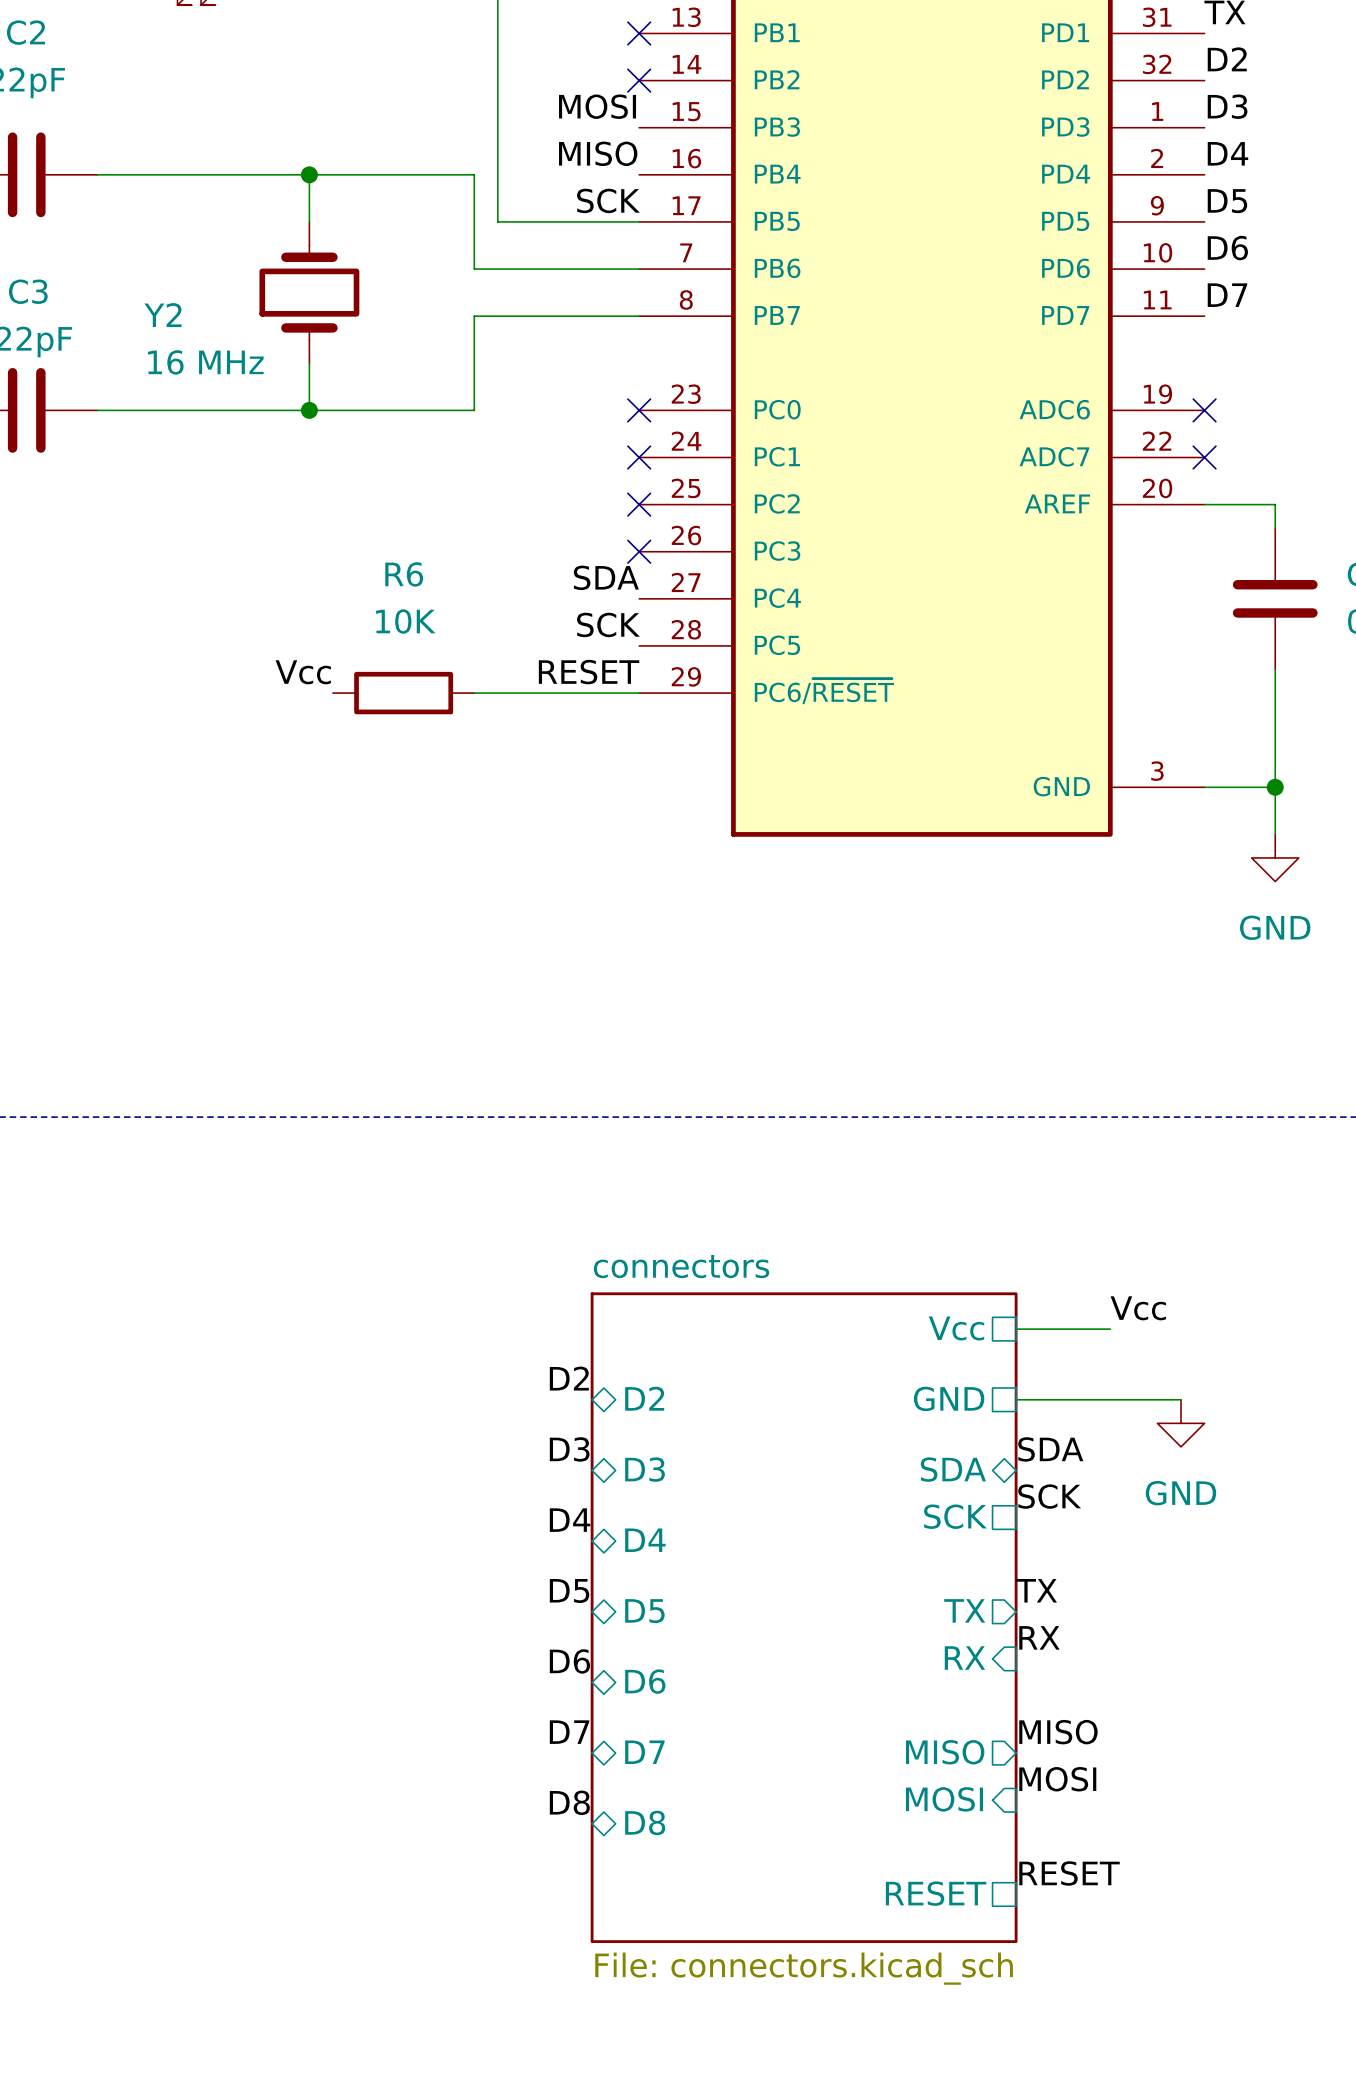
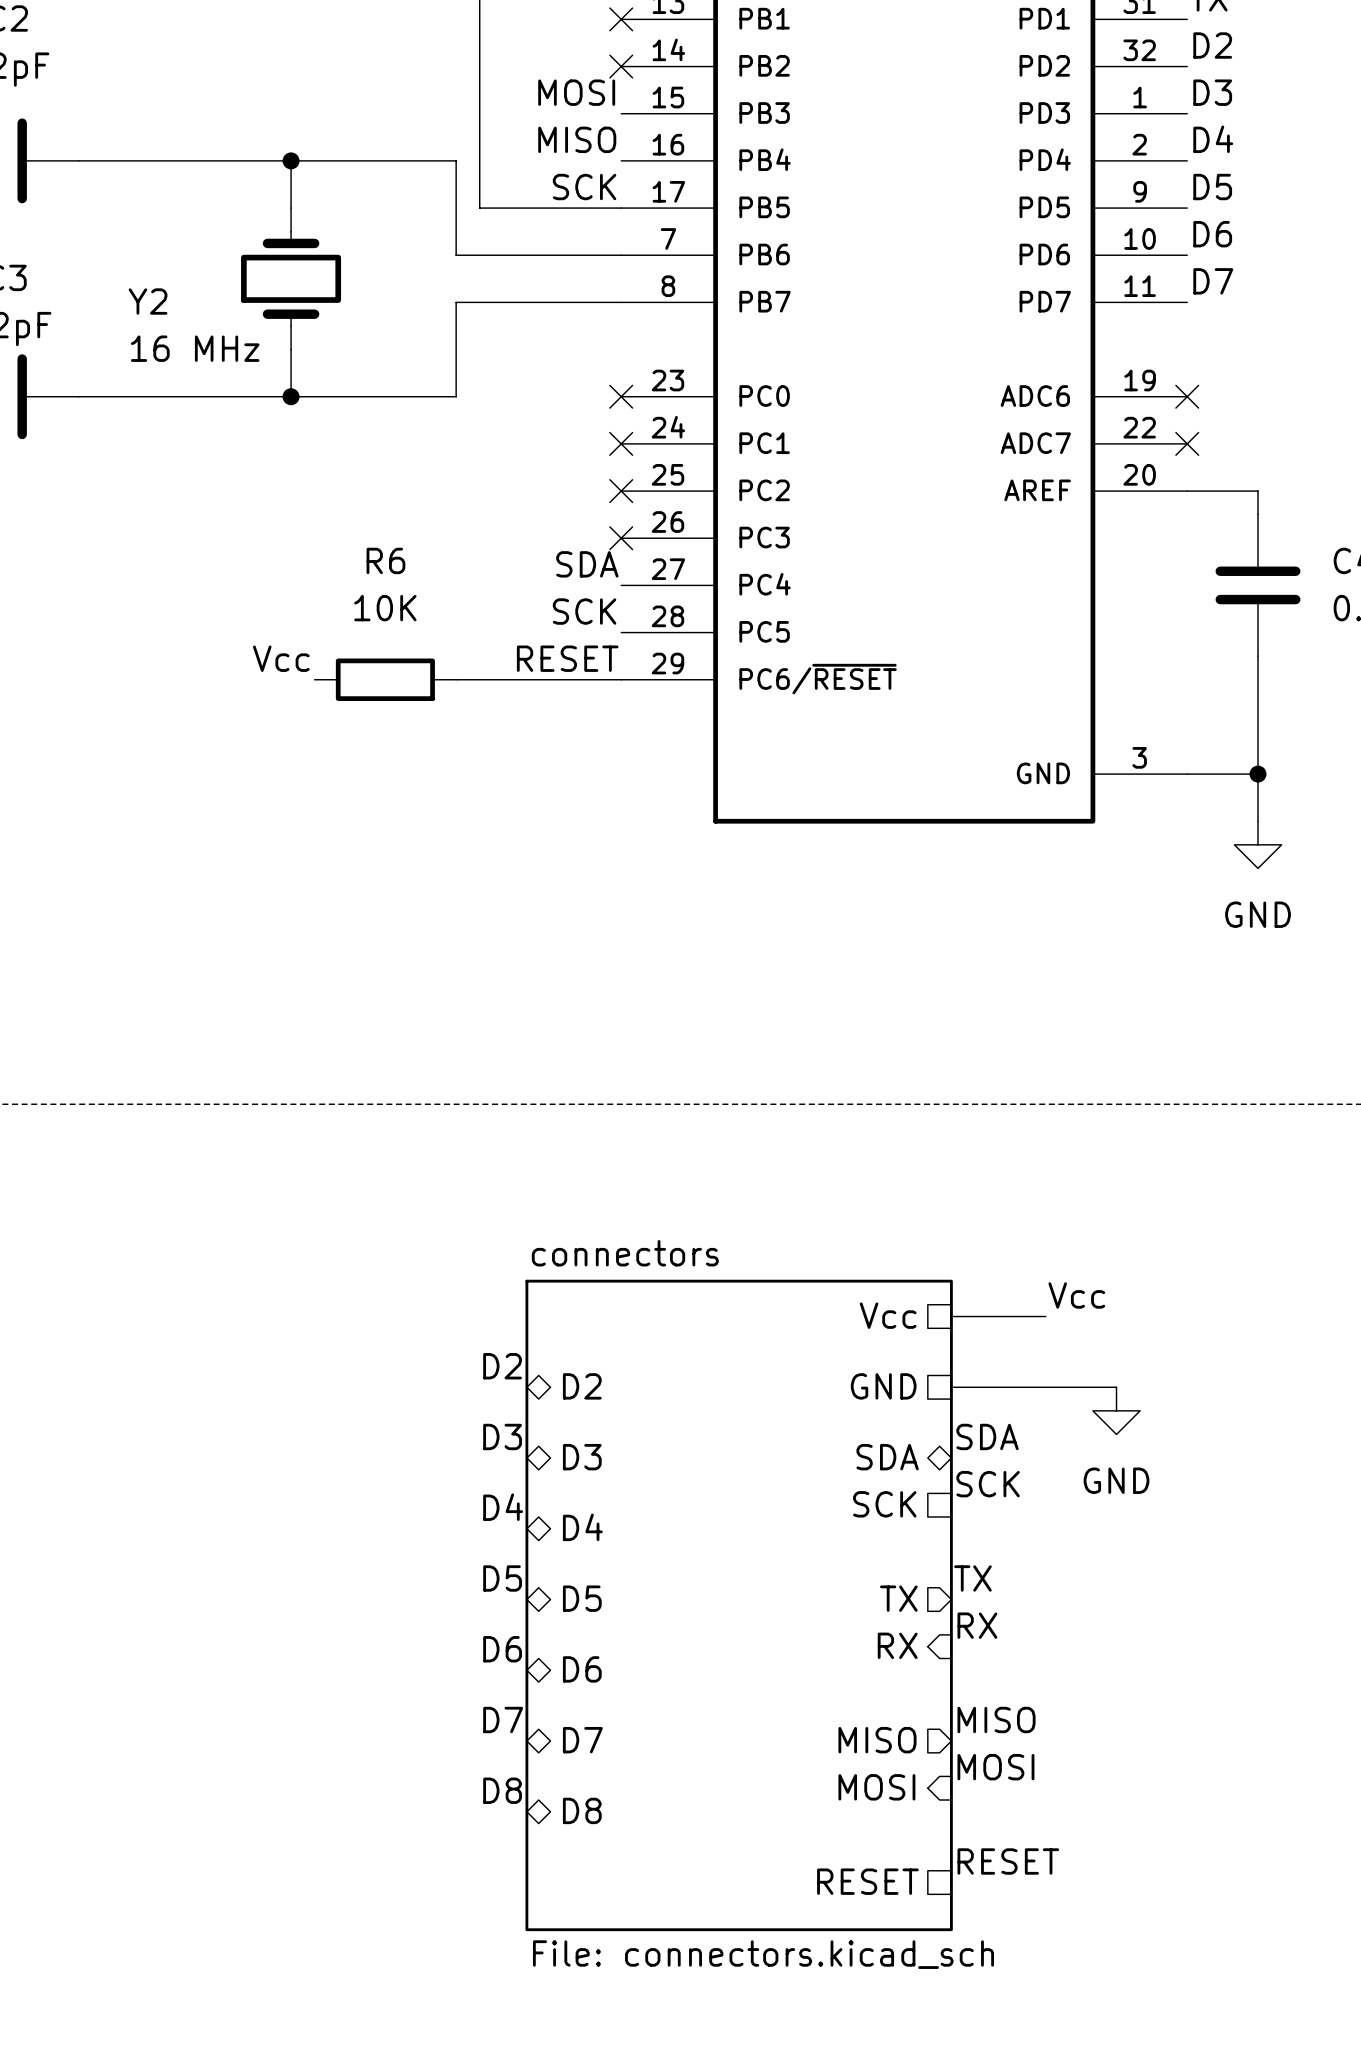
label position: Vcc (1138, 1308) -> Vcc (1076, 1295)
sheet pin position: Vcc (956, 1328) -> Vcc (888, 1315)
wire: (1063, 1329) (1110, 1329) -> (951, 1316) (998, 1316)
label position: D2 (569, 1378) -> D2 (502, 1366)
sheet pin position: D2 (644, 1398) -> D2 (582, 1386)
sheet pin position: GND (949, 1398) -> GND (883, 1386)
wire: (1133, 1399) (1181, 1399) -> (951, 1387) (998, 1387)
power symbol position: GND (1181, 1423) -> GND (1116, 1410)
label position: D3 (569, 1449) -> D3 (502, 1436)
label position: SDA (1050, 1449) -> SDA (987, 1436)
sheet pin position: D3 (645, 1469) -> D3 (582, 1457)
sheet pin position: SDA (953, 1469) -> SDA (887, 1457)
label position: SCK (1049, 1496) -> SCK (988, 1484)
sheet pin position: SCK (955, 1516) -> SCK (884, 1504)
label position: D4 (570, 1520) -> D4 (503, 1507)
sheet pin position: D4 (645, 1540) -> D4 (582, 1527)
label position: TX (1036, 1590) -> TX (972, 1578)
label position: D5 (569, 1591) -> D5 (502, 1578)
sheet pin position: TX (964, 1610) -> TX (898, 1598)
sheet pin position: D5 (644, 1611) -> D5 (582, 1598)
sheet connectors position: (804, 1617) -> (739, 1605)
label position: RX (1039, 1637) -> RX (977, 1625)
sheet pin position: RX (964, 1658) -> RX (897, 1645)
label position: D6 (569, 1661) -> D6 (502, 1649)
sheet pin position: D6 (645, 1681) -> D6 (582, 1669)
label position: D7 (569, 1732) -> D7 (503, 1720)
label position: MISO (1058, 1732) -> MISO (996, 1720)
sheet pin position: D7 (644, 1752) -> D7 (582, 1740)
sheet pin position: MISO (945, 1752) -> MISO (877, 1740)
label position: MOSI (1057, 1779) -> MOSI (995, 1767)
sheet pin position: MOSI (944, 1799) -> MOSI (876, 1787)
label position: D8 (569, 1802) -> D8 (502, 1790)
sheet pin position: D8 (645, 1822) -> D8 (582, 1810)
label position: RESET (1069, 1873) -> RESET (1008, 1861)
sheet pin position: RESET (936, 1893) -> RESET (867, 1881)

